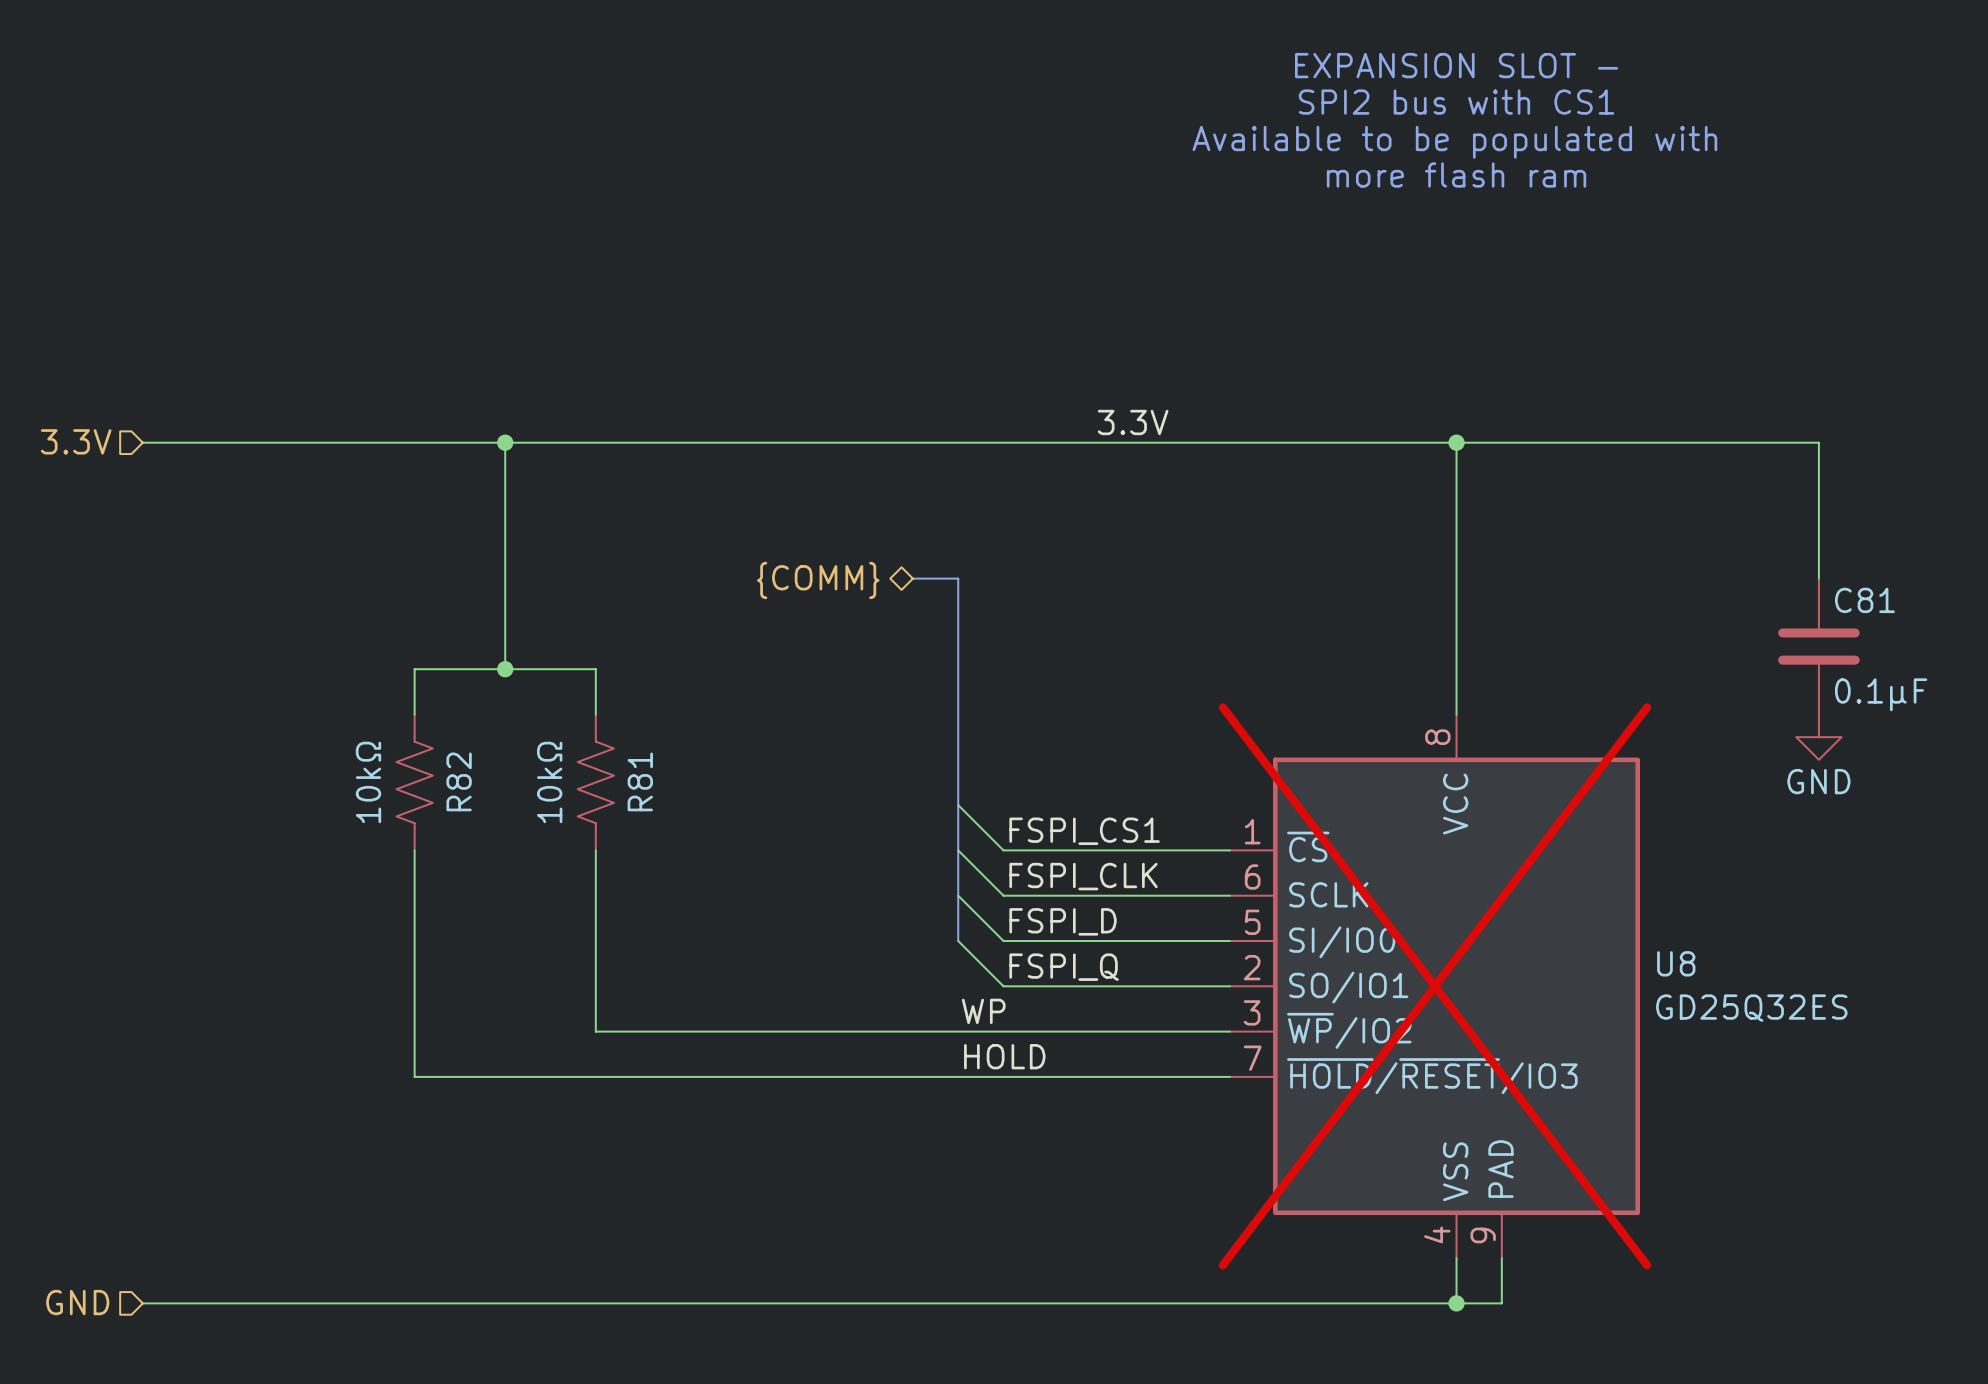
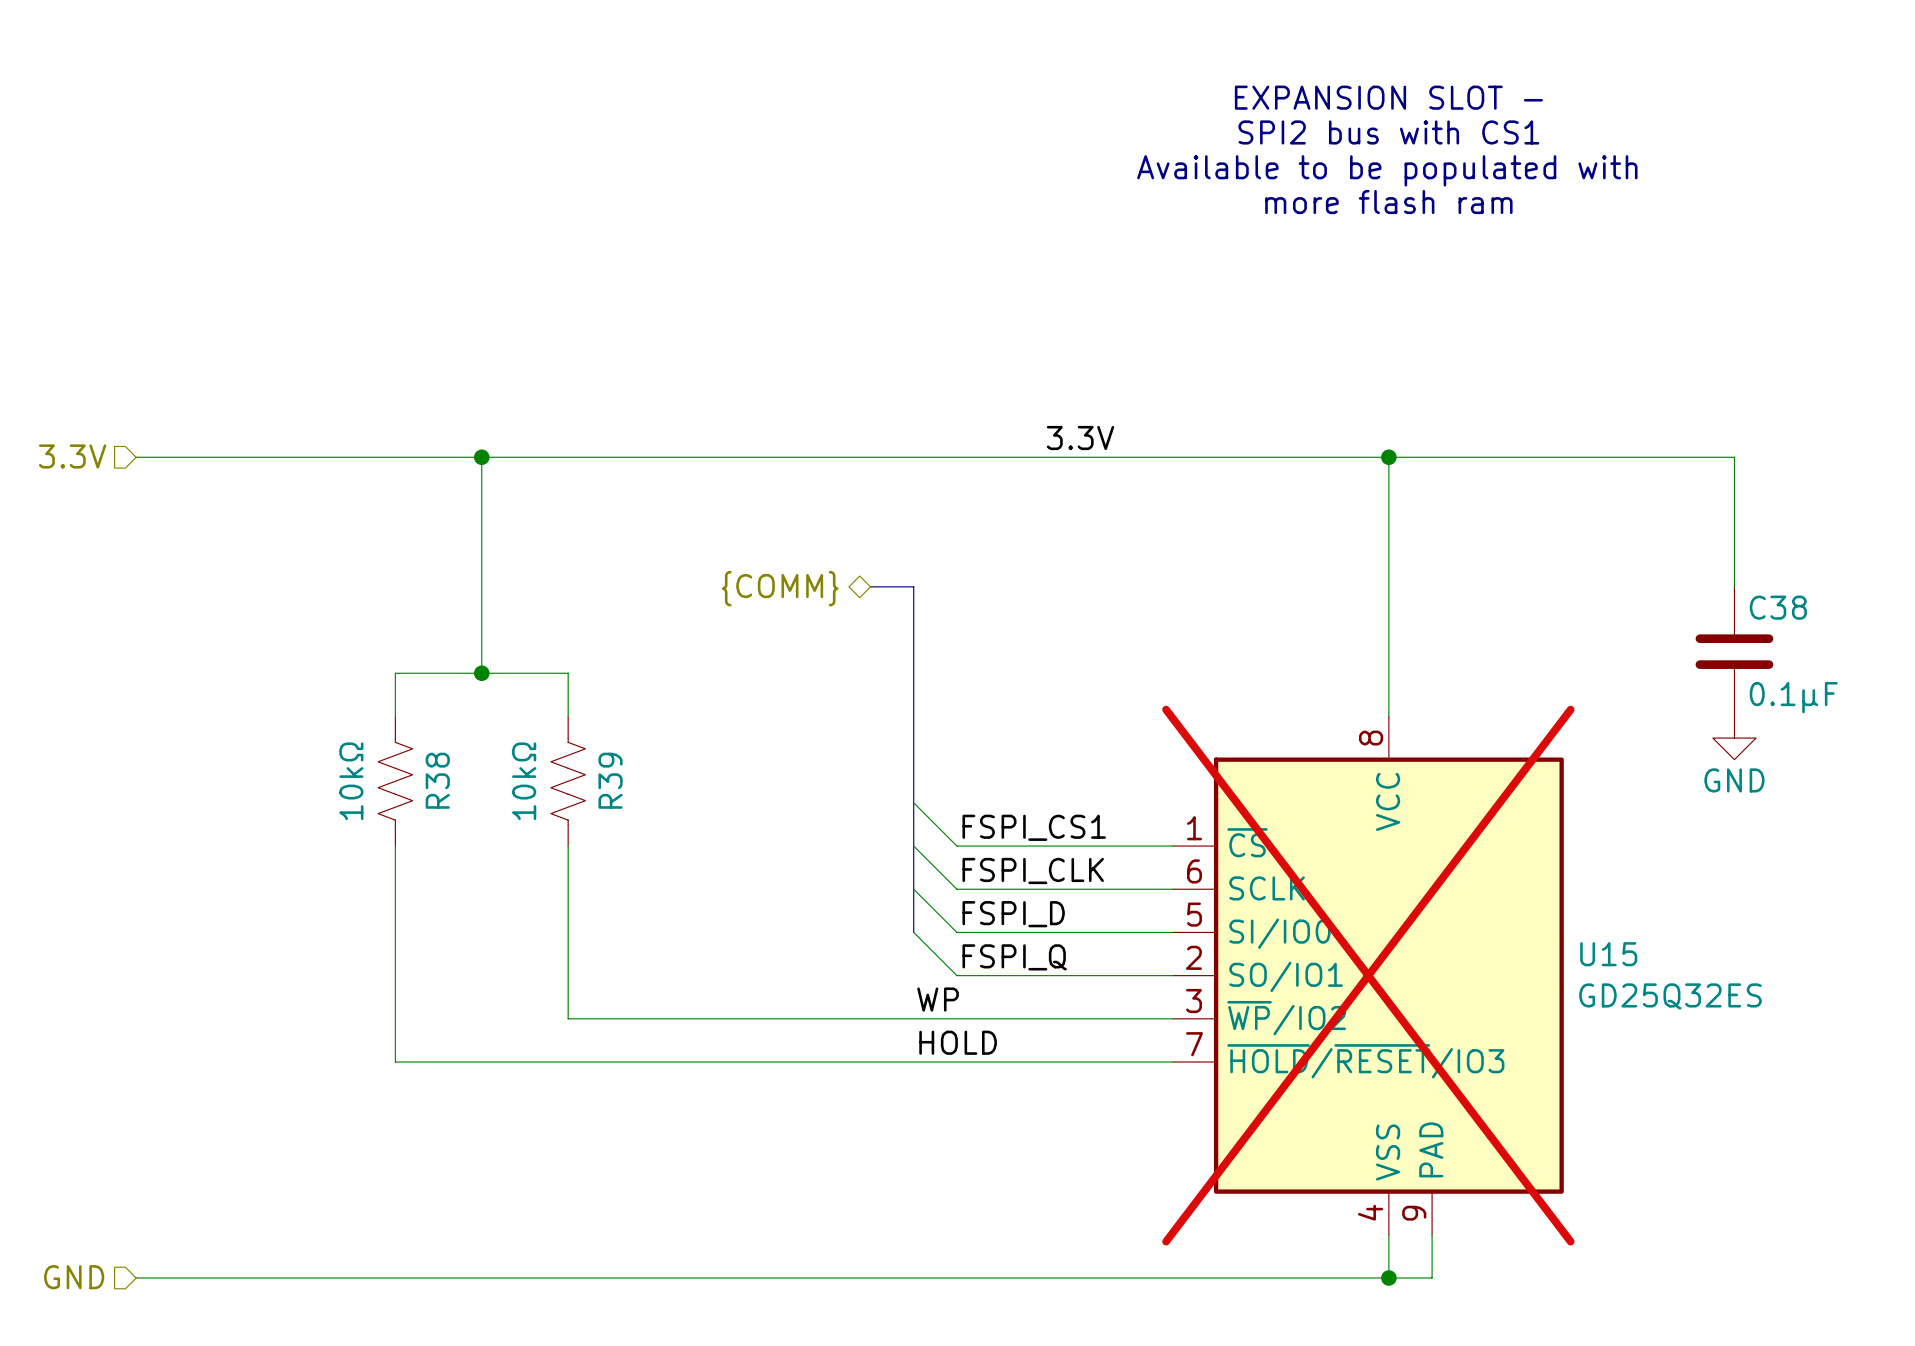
C81 name: C81 (1864, 600) -> C38 (1778, 607)
R82 name: R82 (459, 781) -> R38 (437, 780)
R81 name: R81 (640, 781) -> R39 (610, 780)
U8 name: U8 (1676, 963) -> U15 (1608, 954)

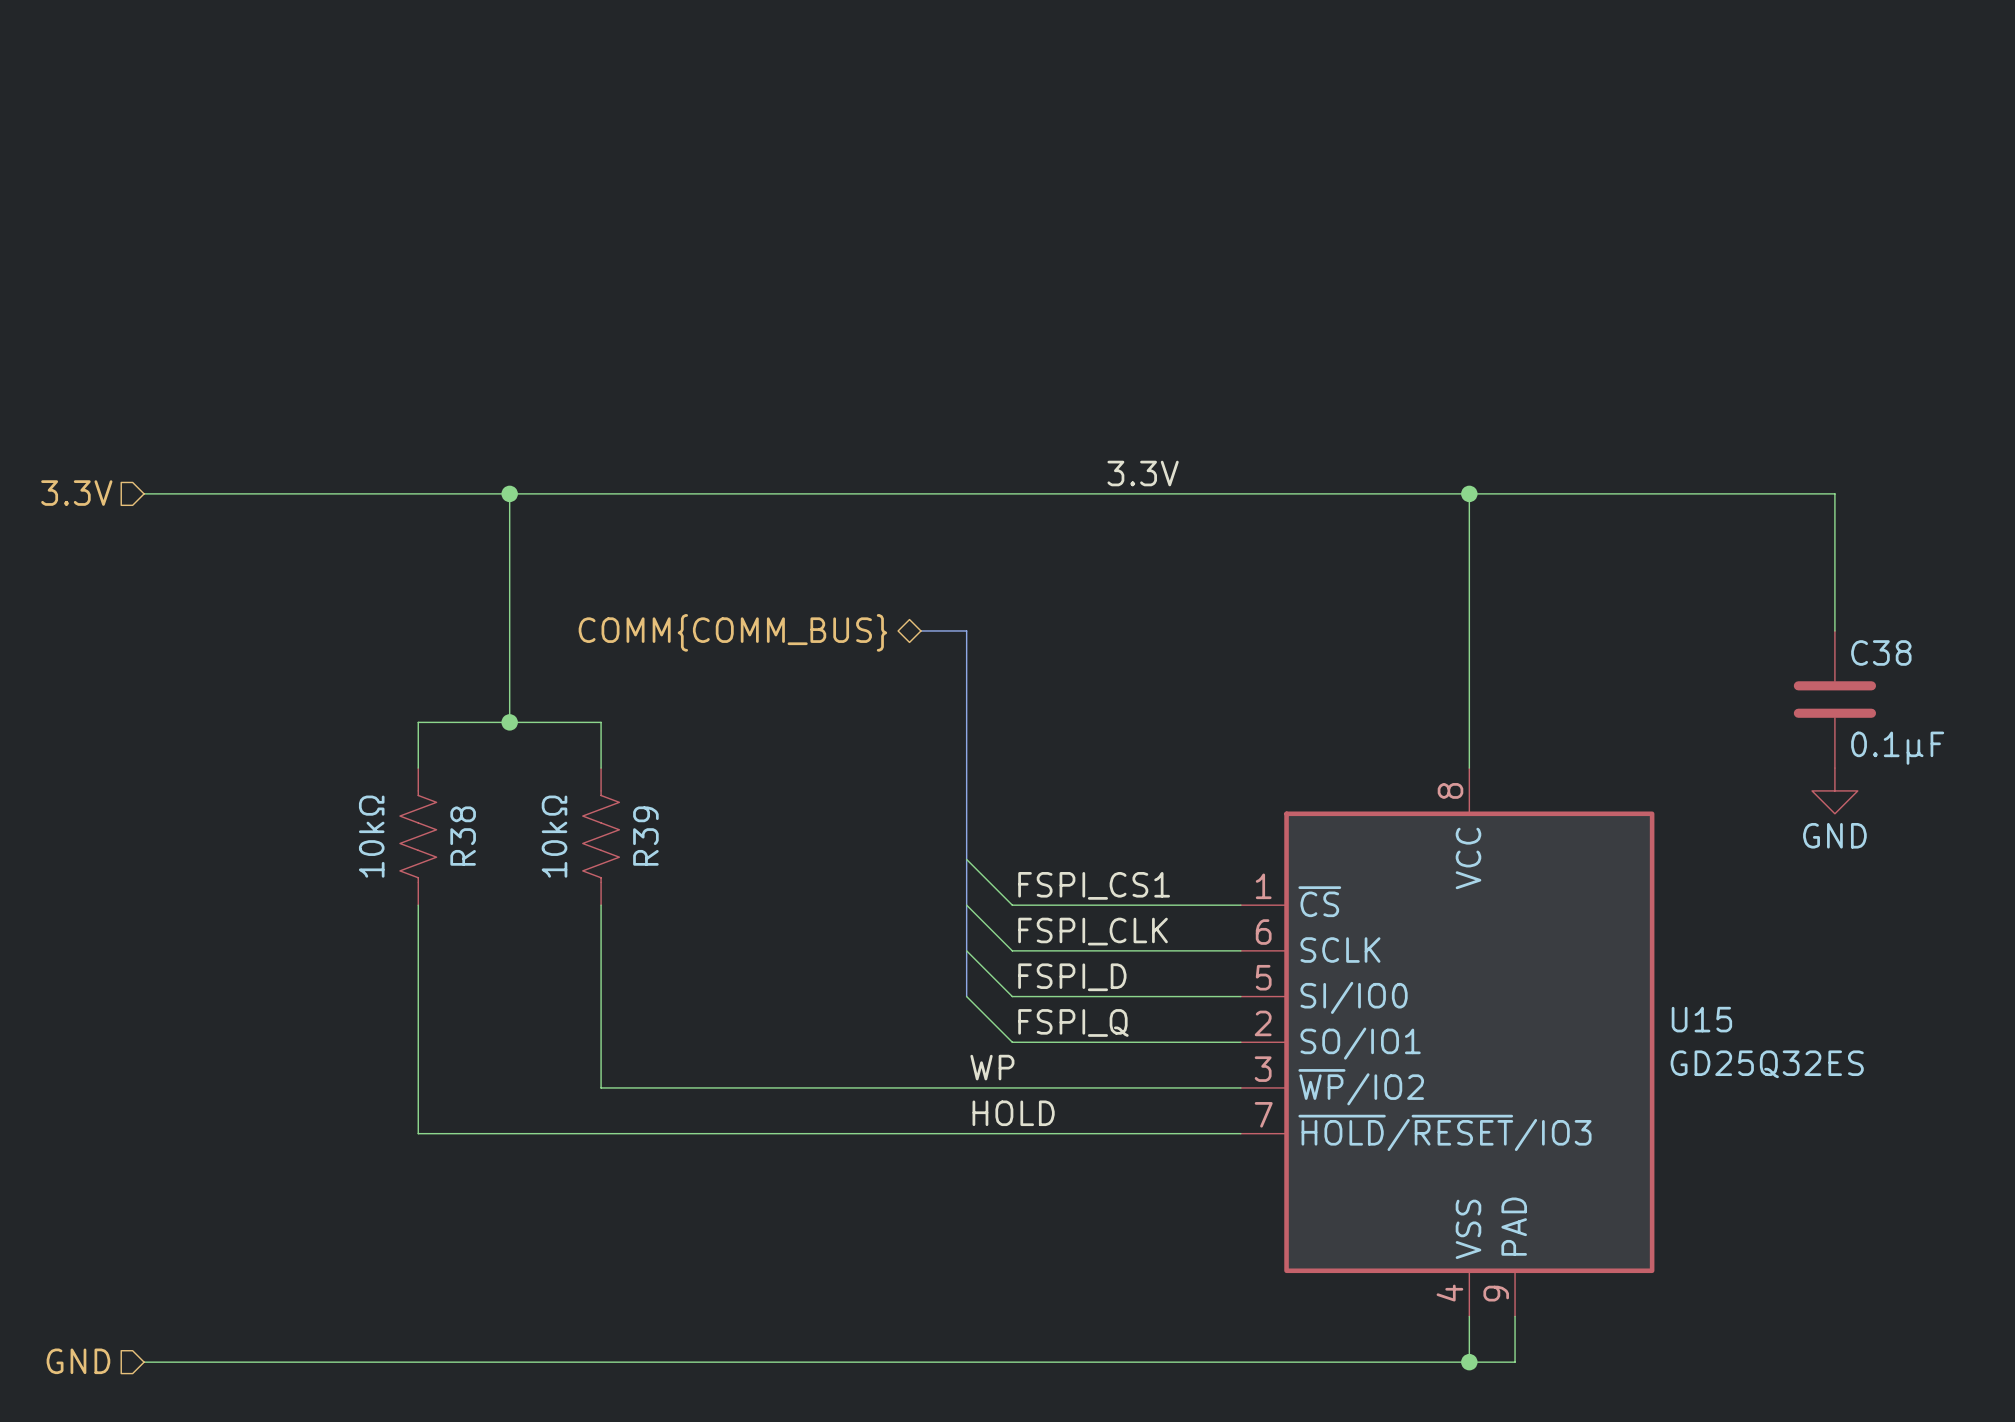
text: EXPANSION SLOT - (1388, 97) -> none
text: SPI2 bus with CS1 (1388, 132) -> none
text: Available to be populated with (1387, 170) -> none
text: more flash ram (1388, 202) -> none
hierarchical label: {COMM} (780, 588) -> COMM{COMM_BUS} (732, 632)
U15 do-not-place cross: (1368, 975) -> none

